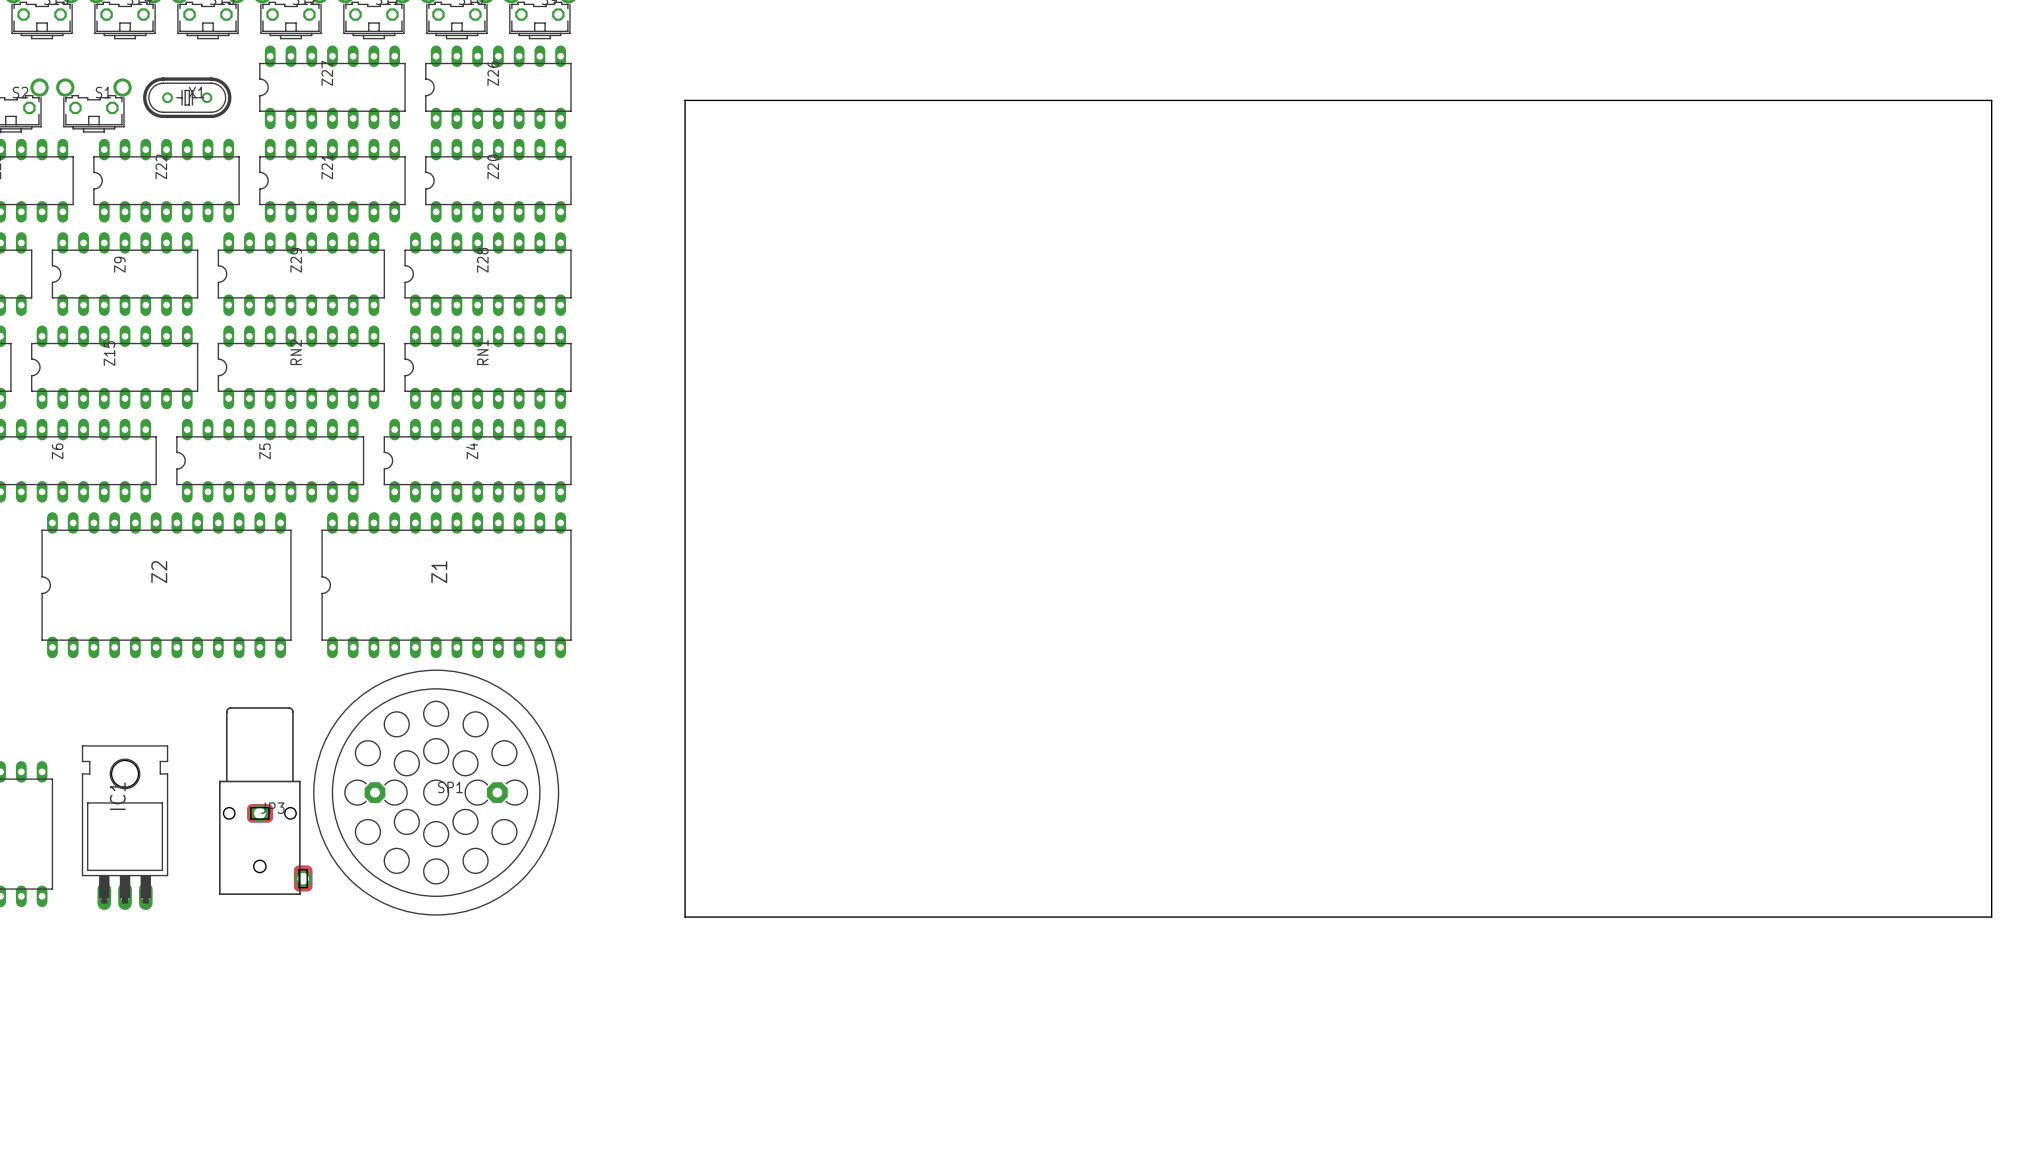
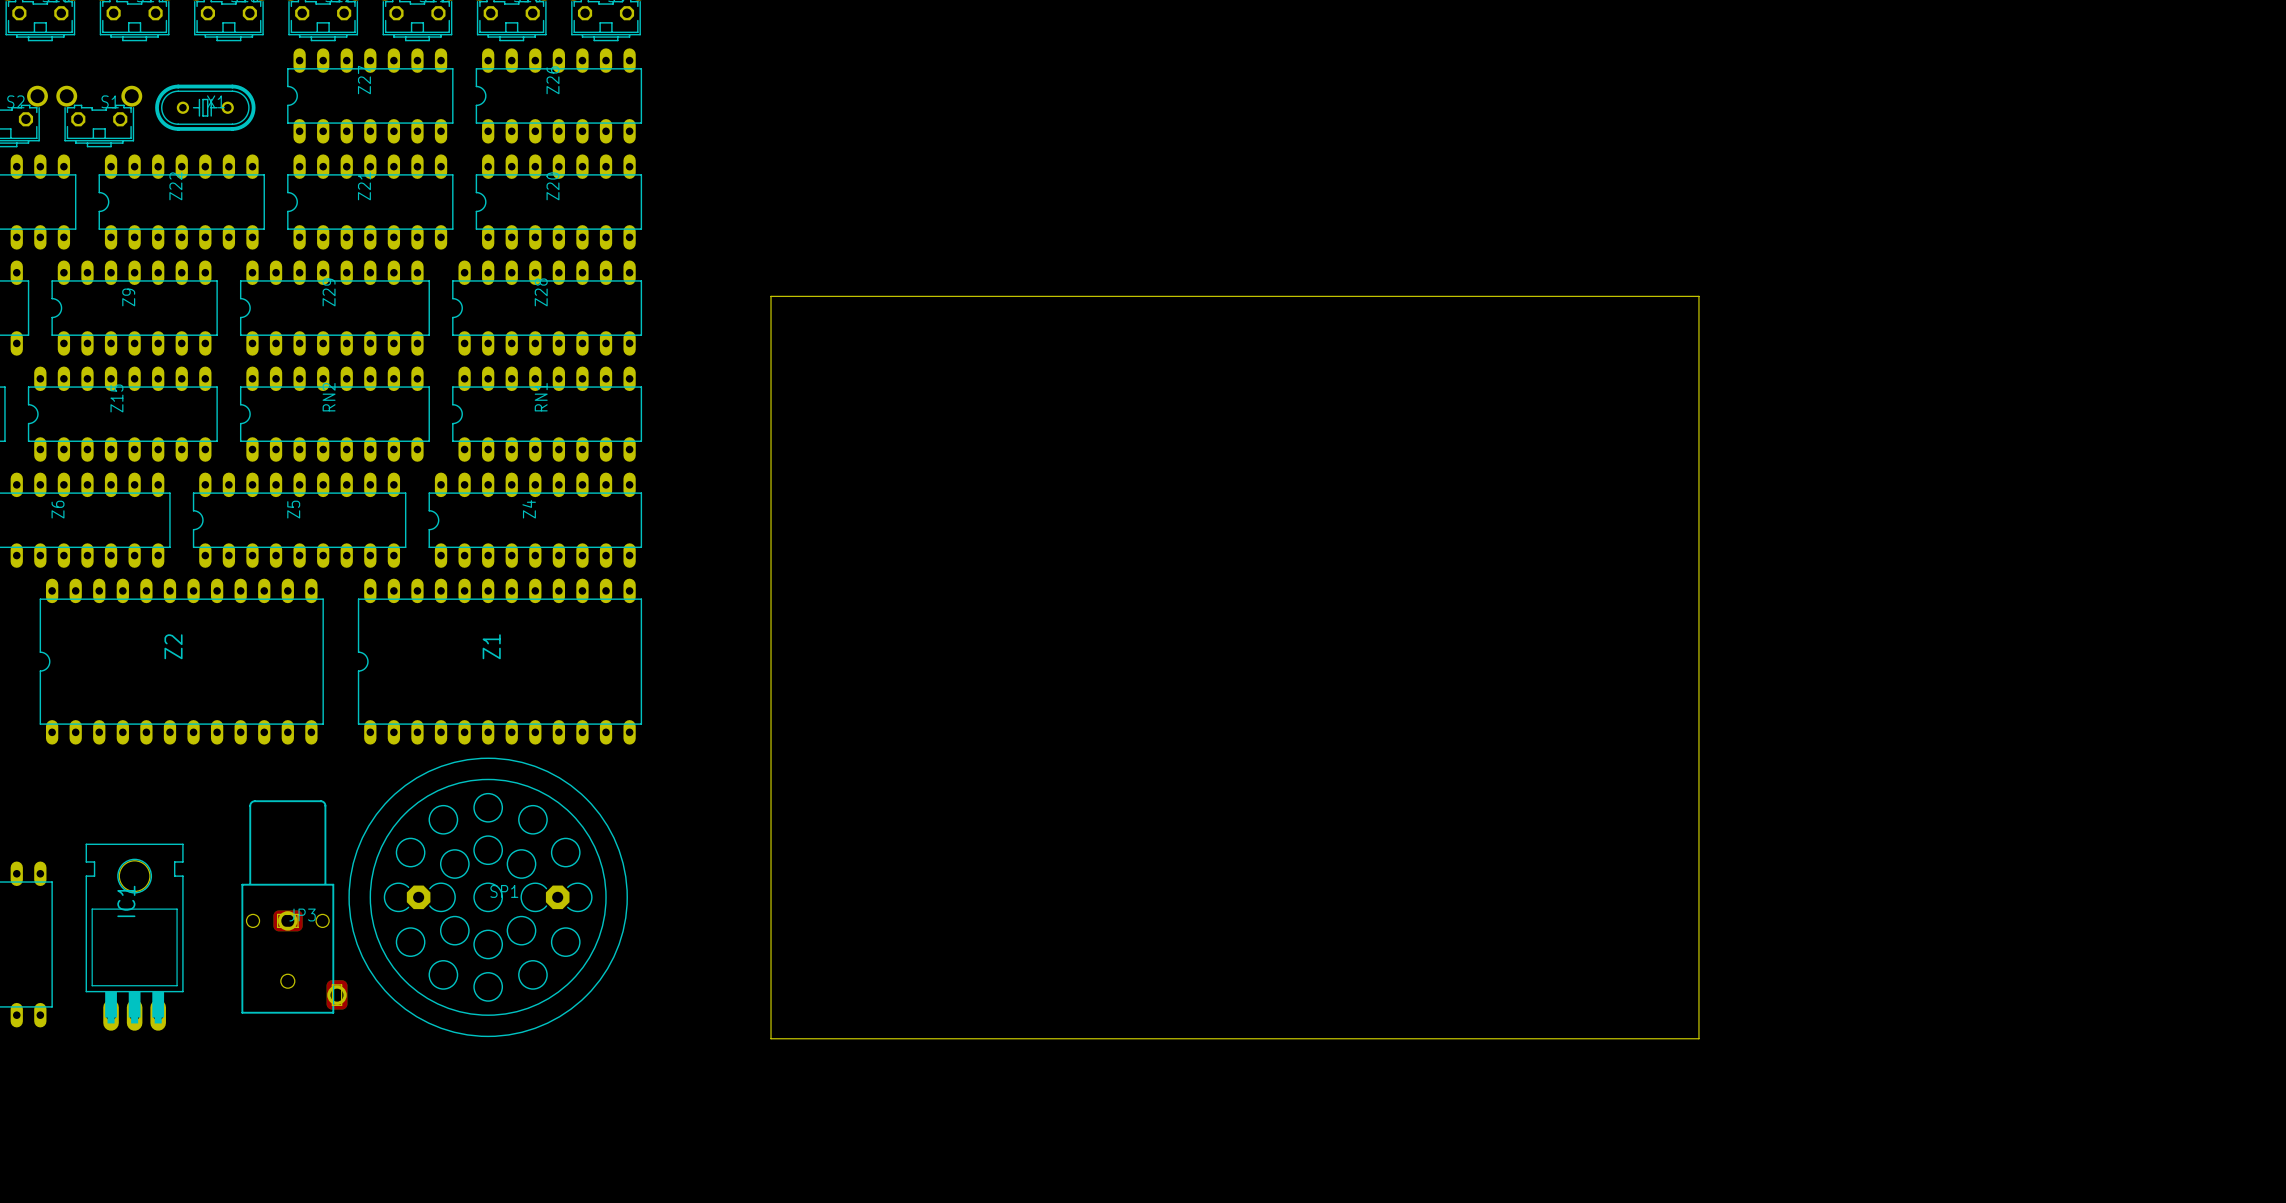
board edge: (685, 263) (685, 100) (1991, 100) (1991, 917) (1501, 917) -> (771, 296) (1698, 296) (1698, 1038)

